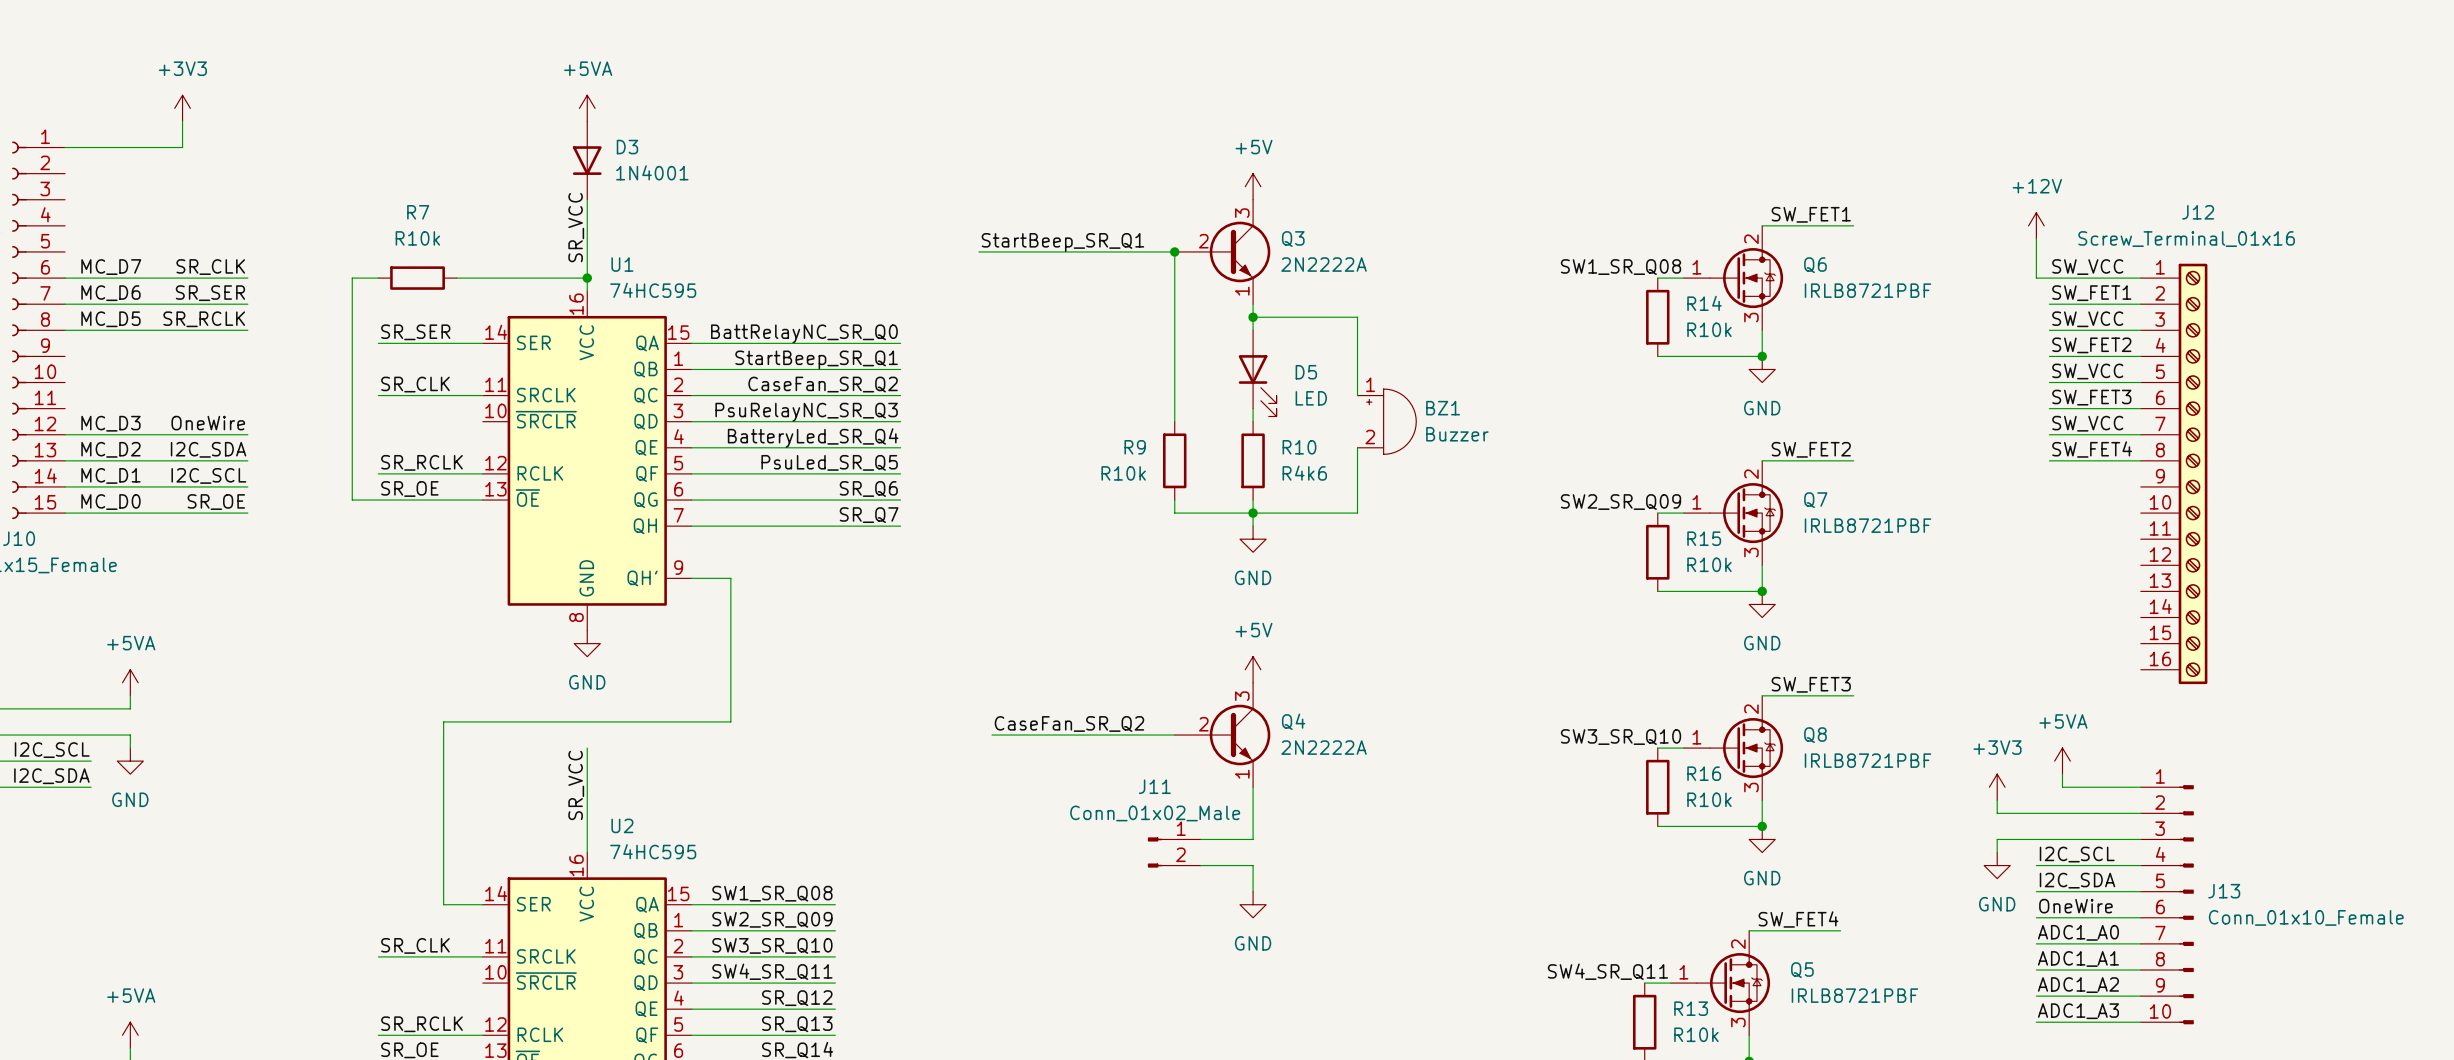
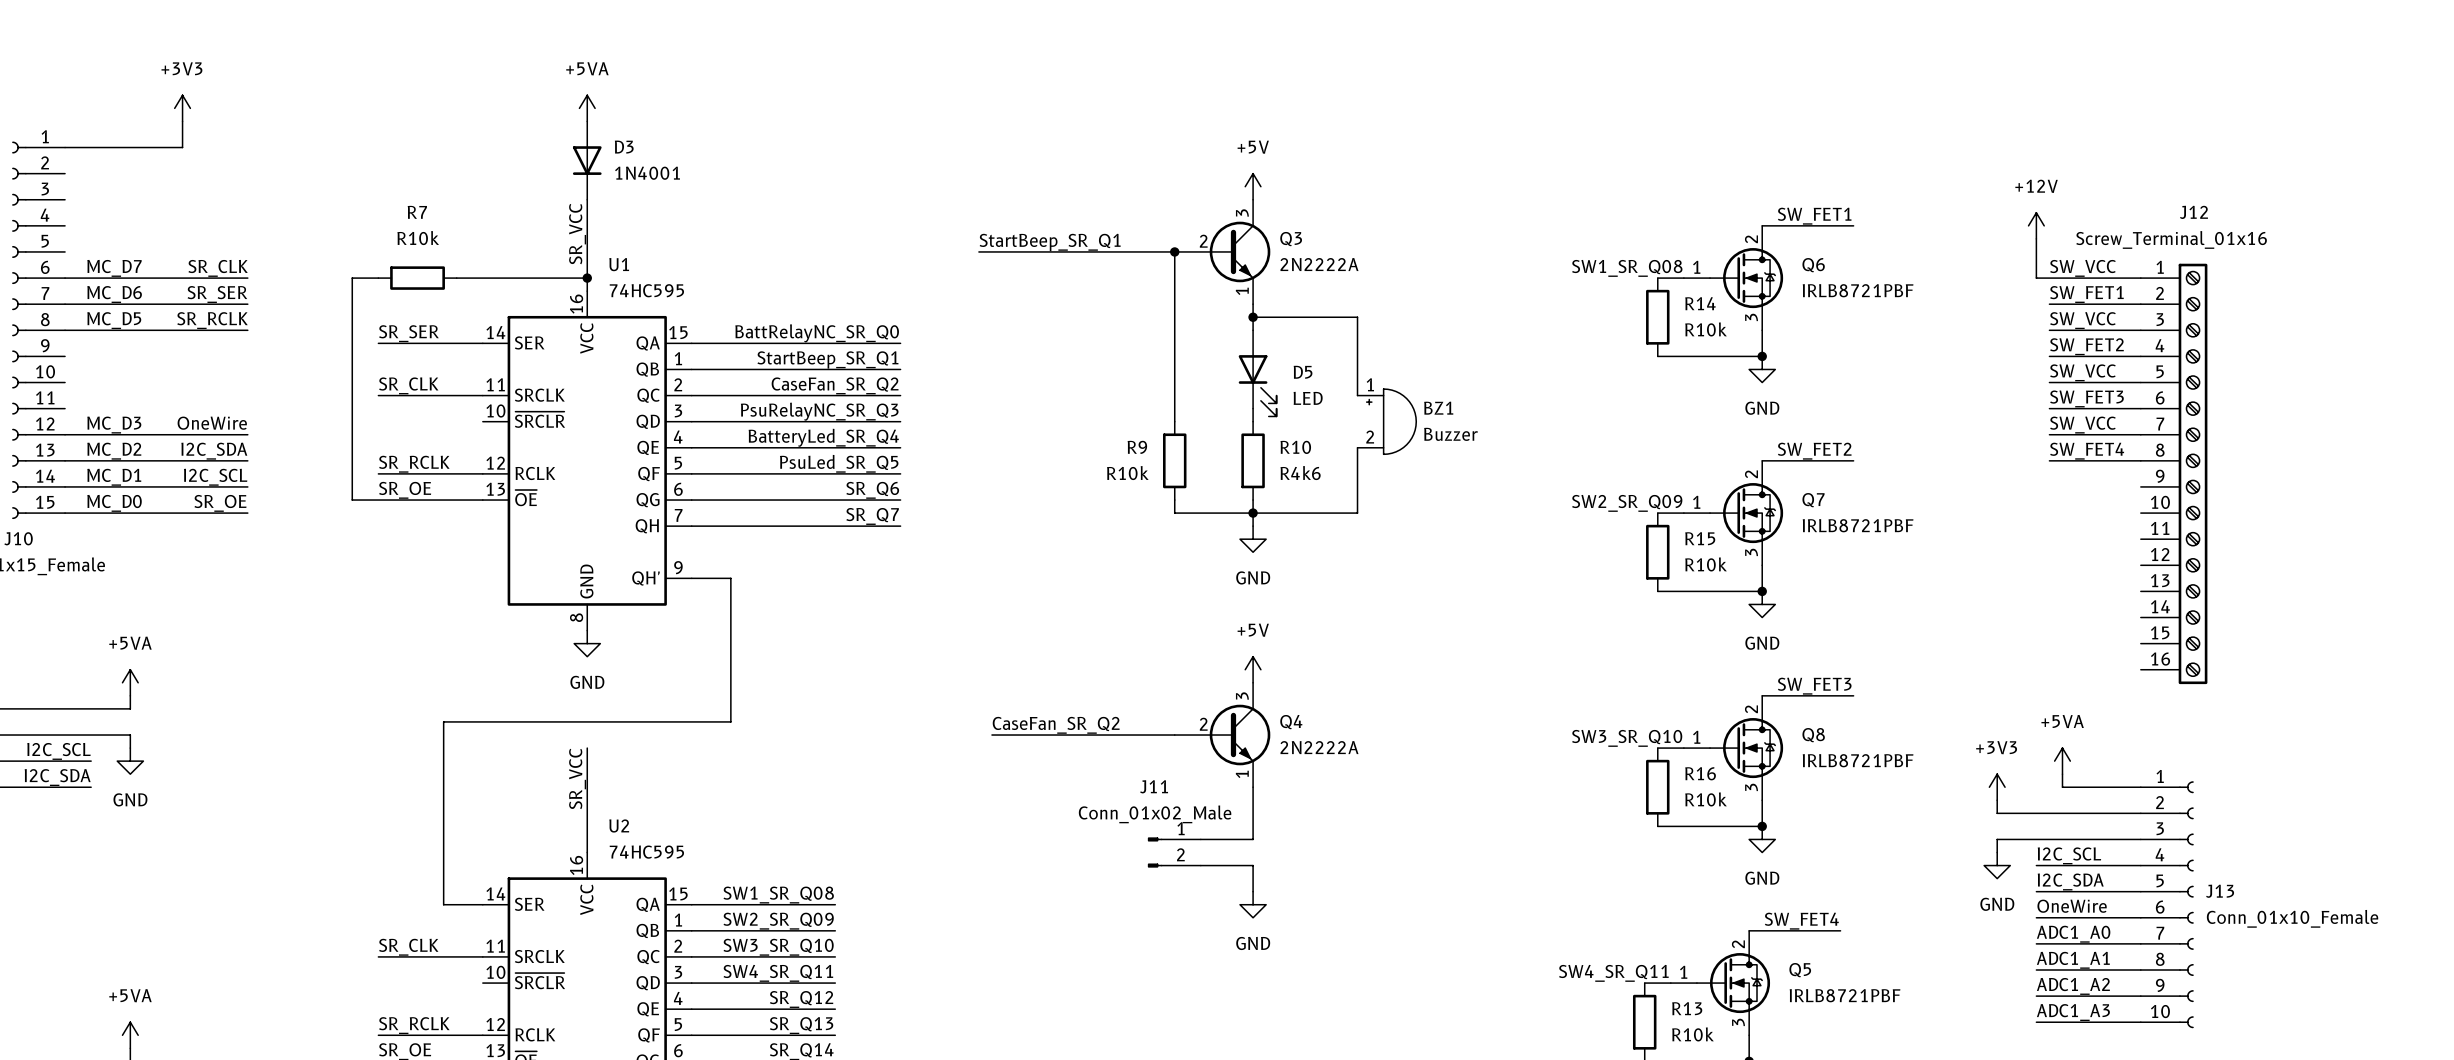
J13 symbol: [2140, 785, 2194, 1025] -> [2140, 781, 2194, 1029]

